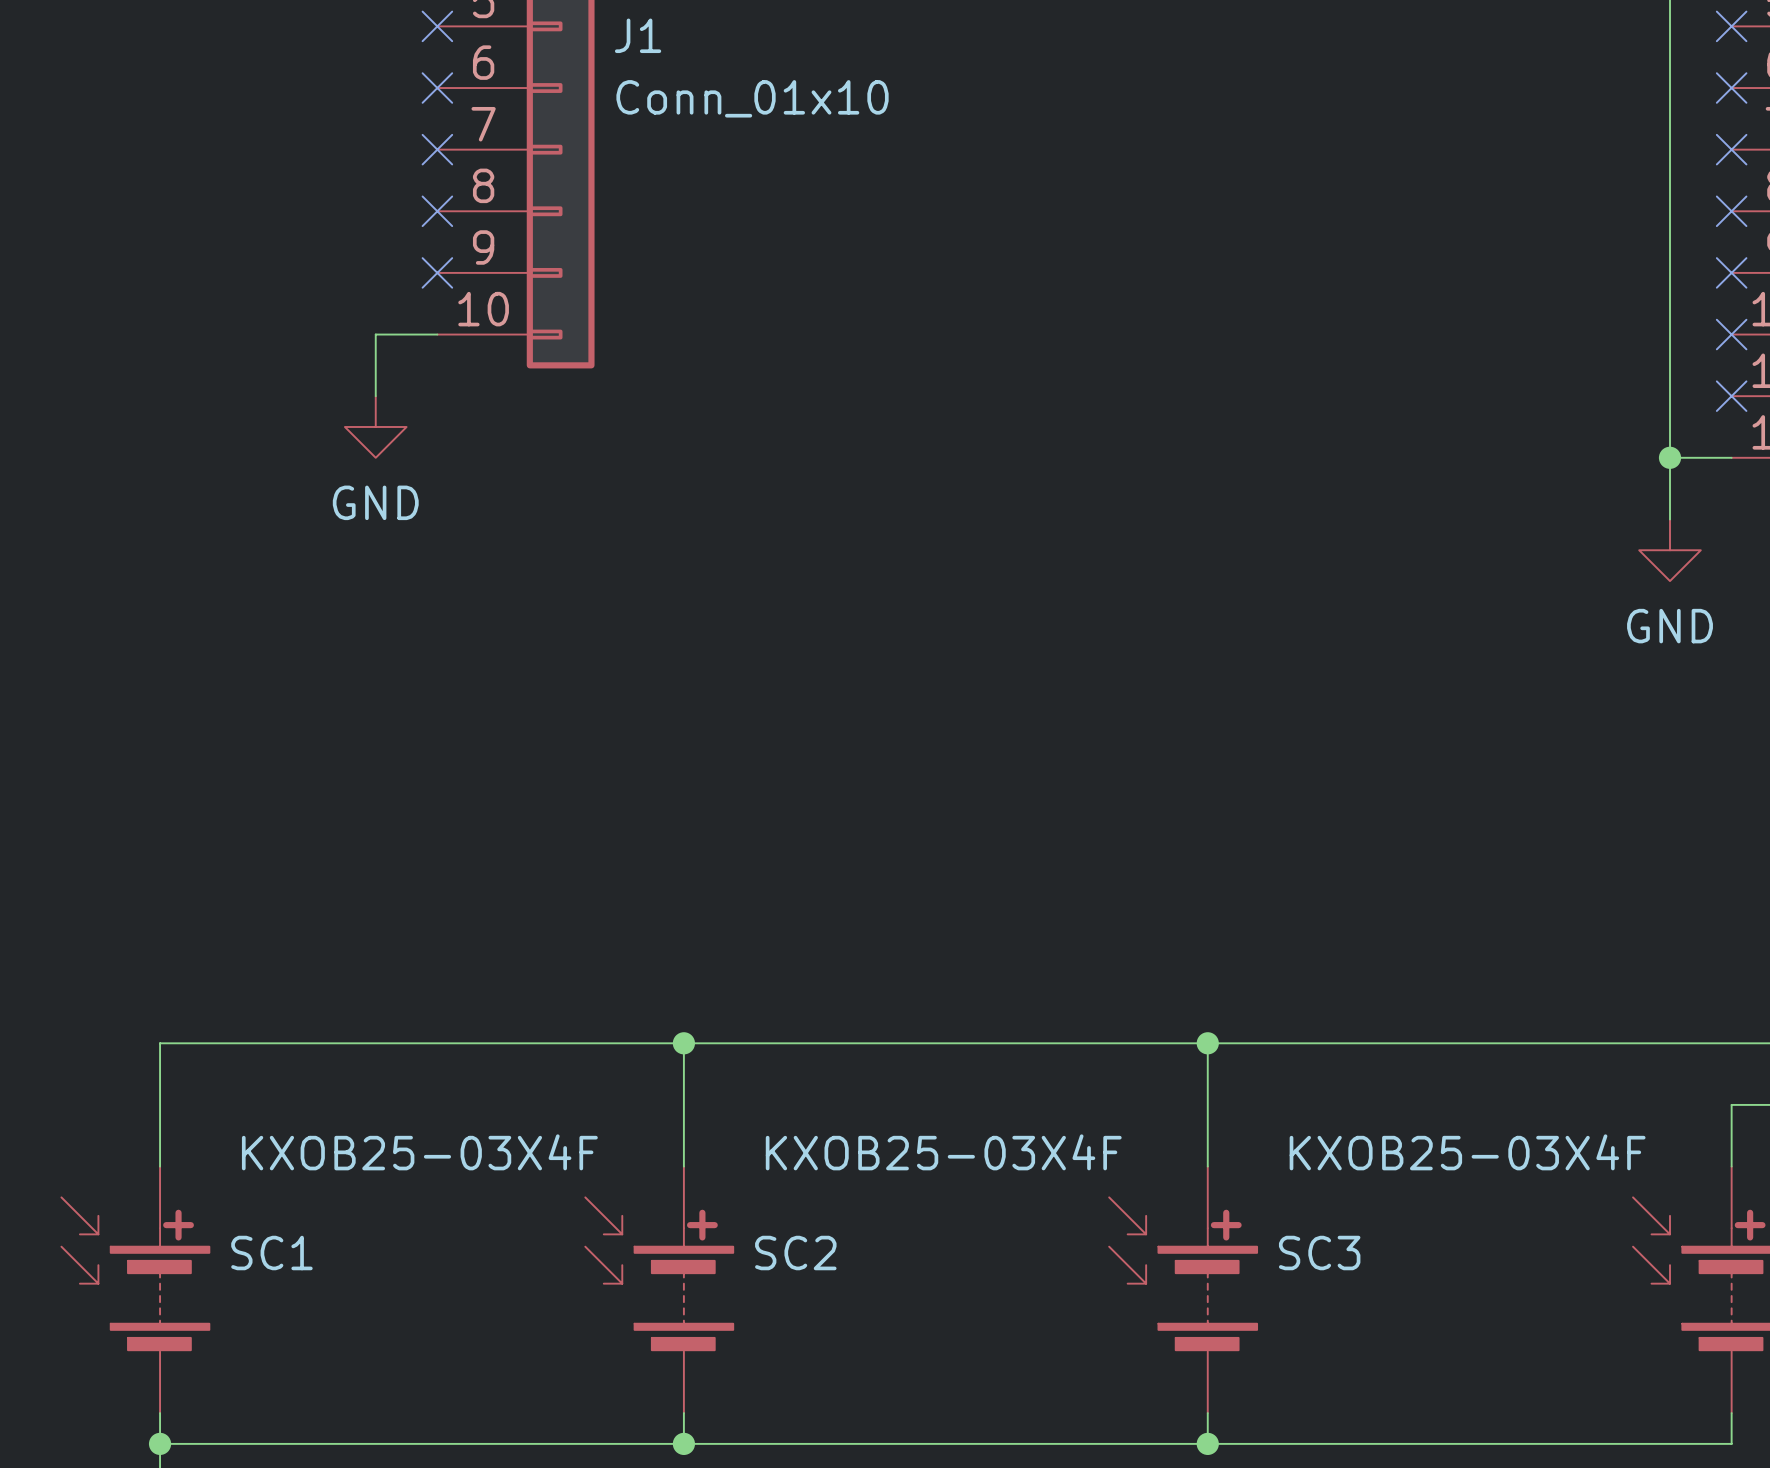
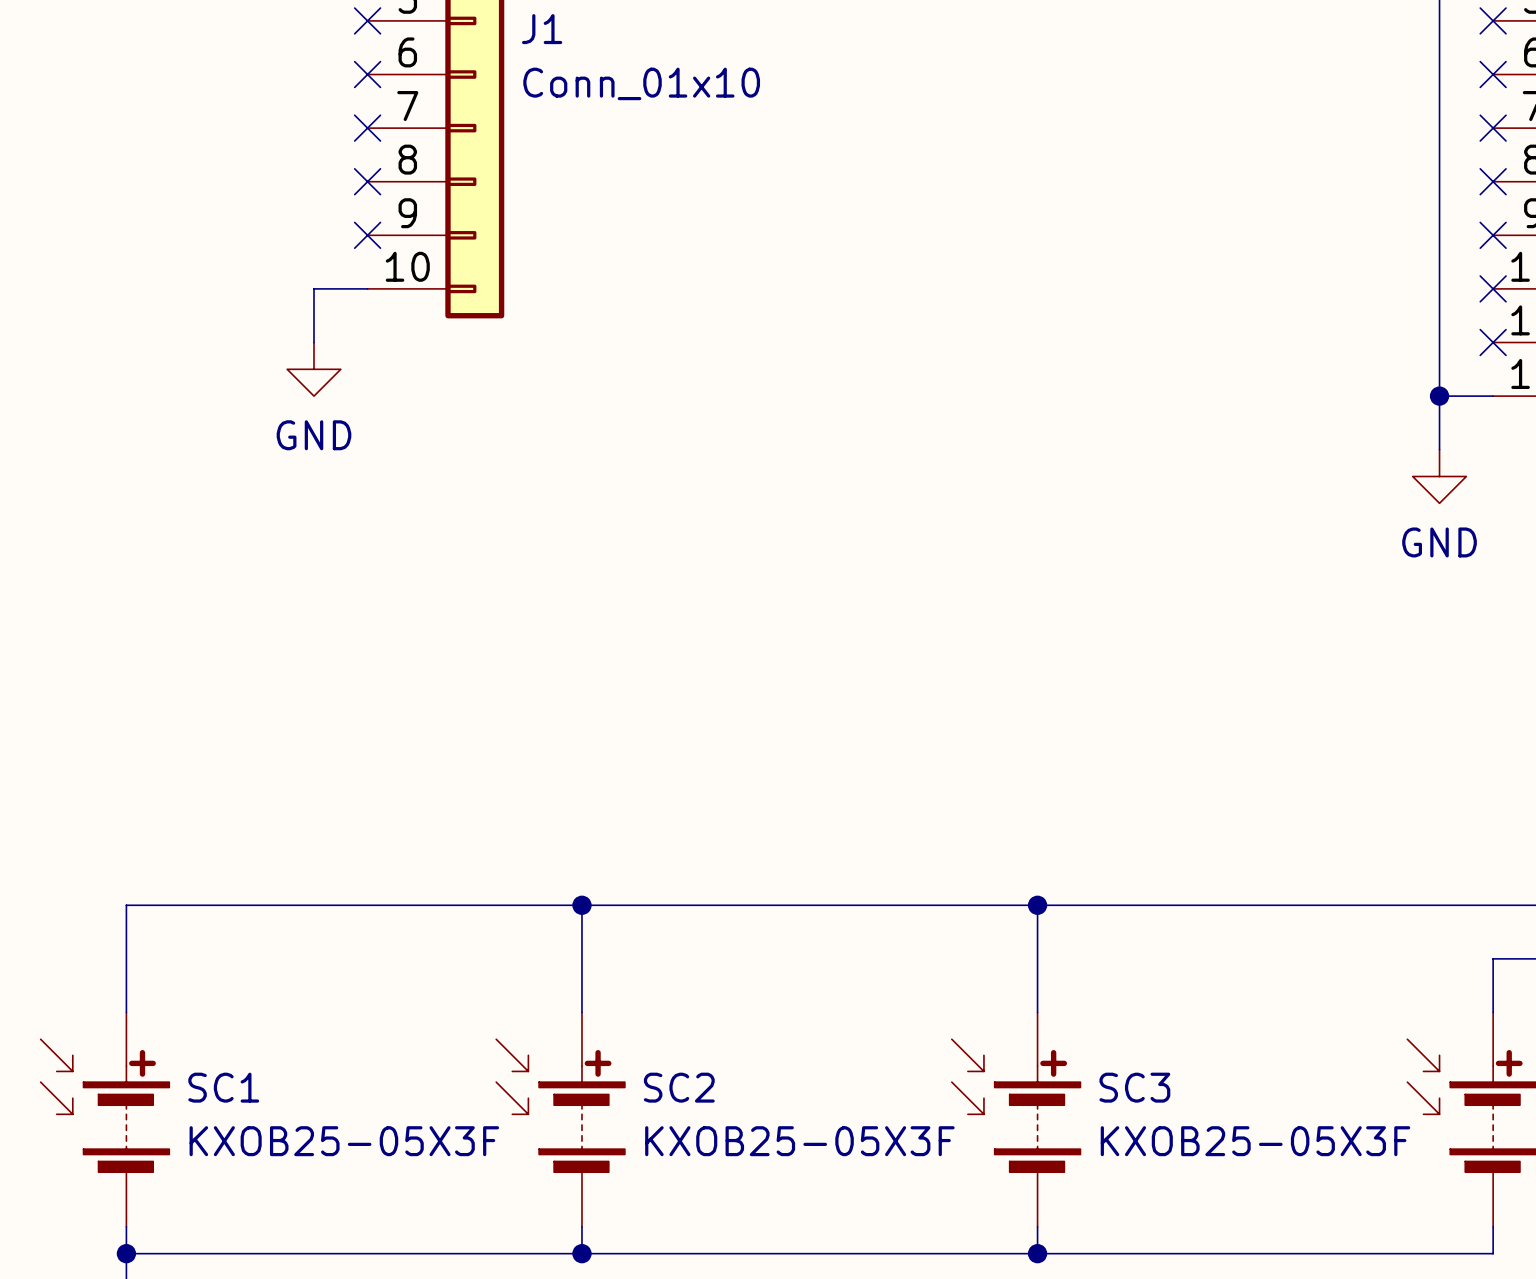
SC1 value: KXOB25-03X4F (419, 1152) -> KXOB25-05X3F (344, 1141)
SC2 value: KXOB25-03X4F (943, 1152) -> KXOB25-05X3F (799, 1141)
SC3 value: KXOB25-03X4F (1467, 1152) -> KXOB25-05X3F (1255, 1141)

